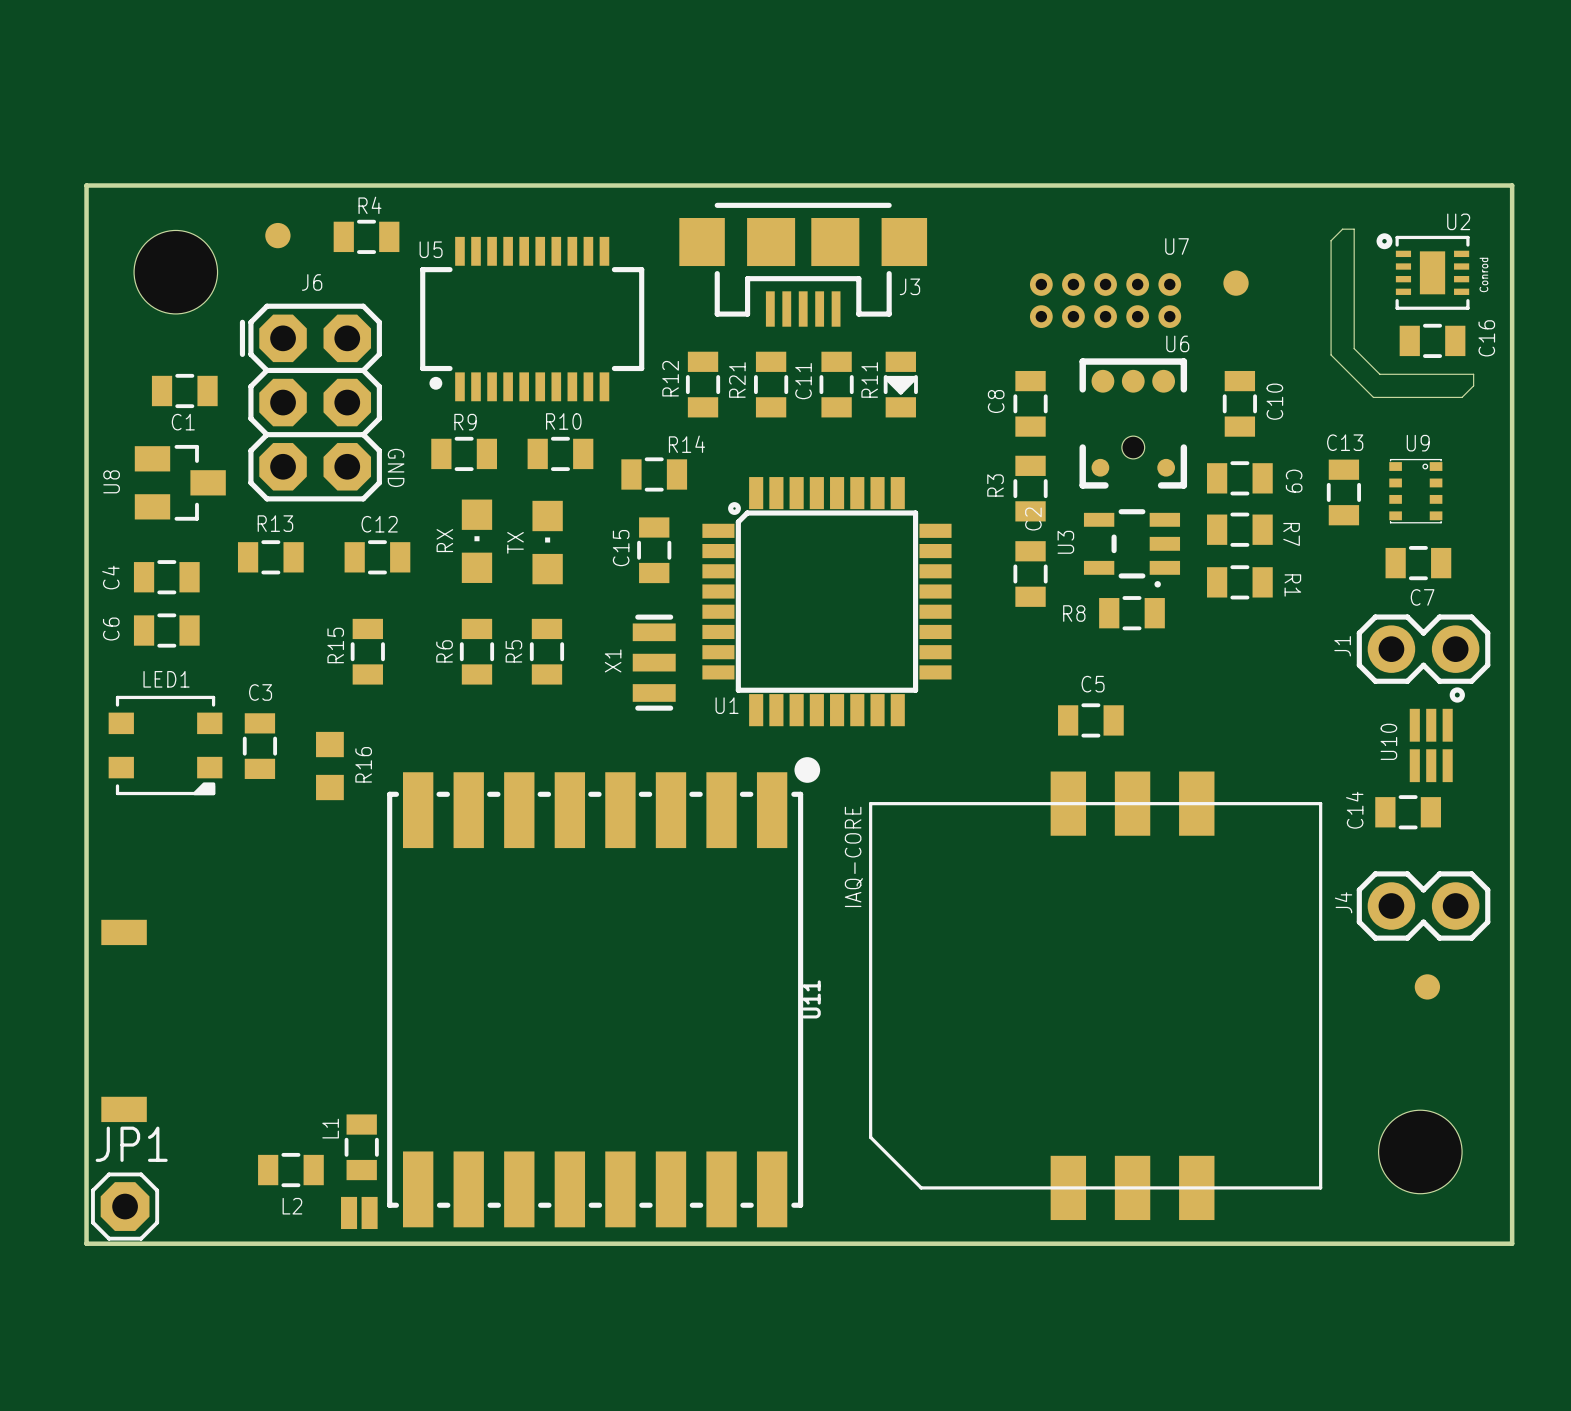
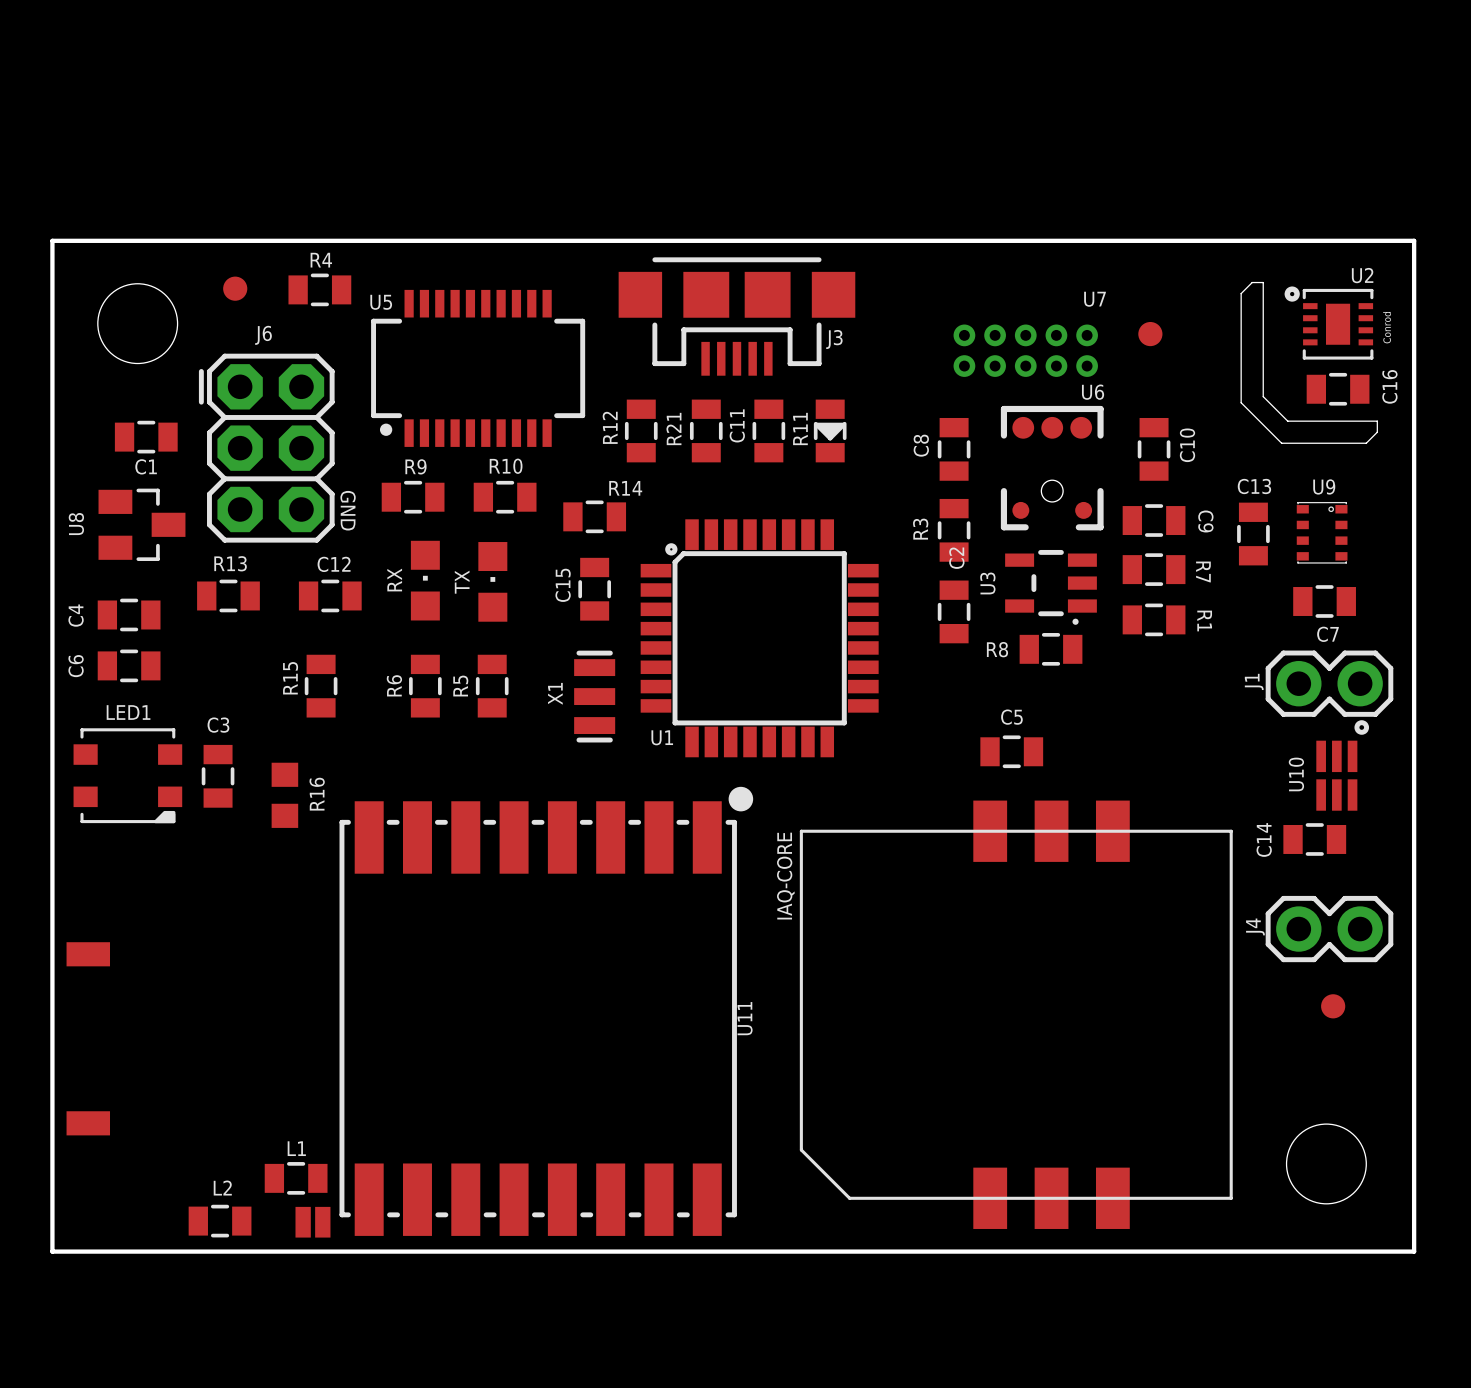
L1 rotation: 0° (361, 1147) -> 90° clockwise (296, 1178)
L2 position: (290, 1170) -> (220, 1221)
JP1: (125, 1206) -> none
L2 name position: L2 (292, 1206) -> L2 (222, 1188)

